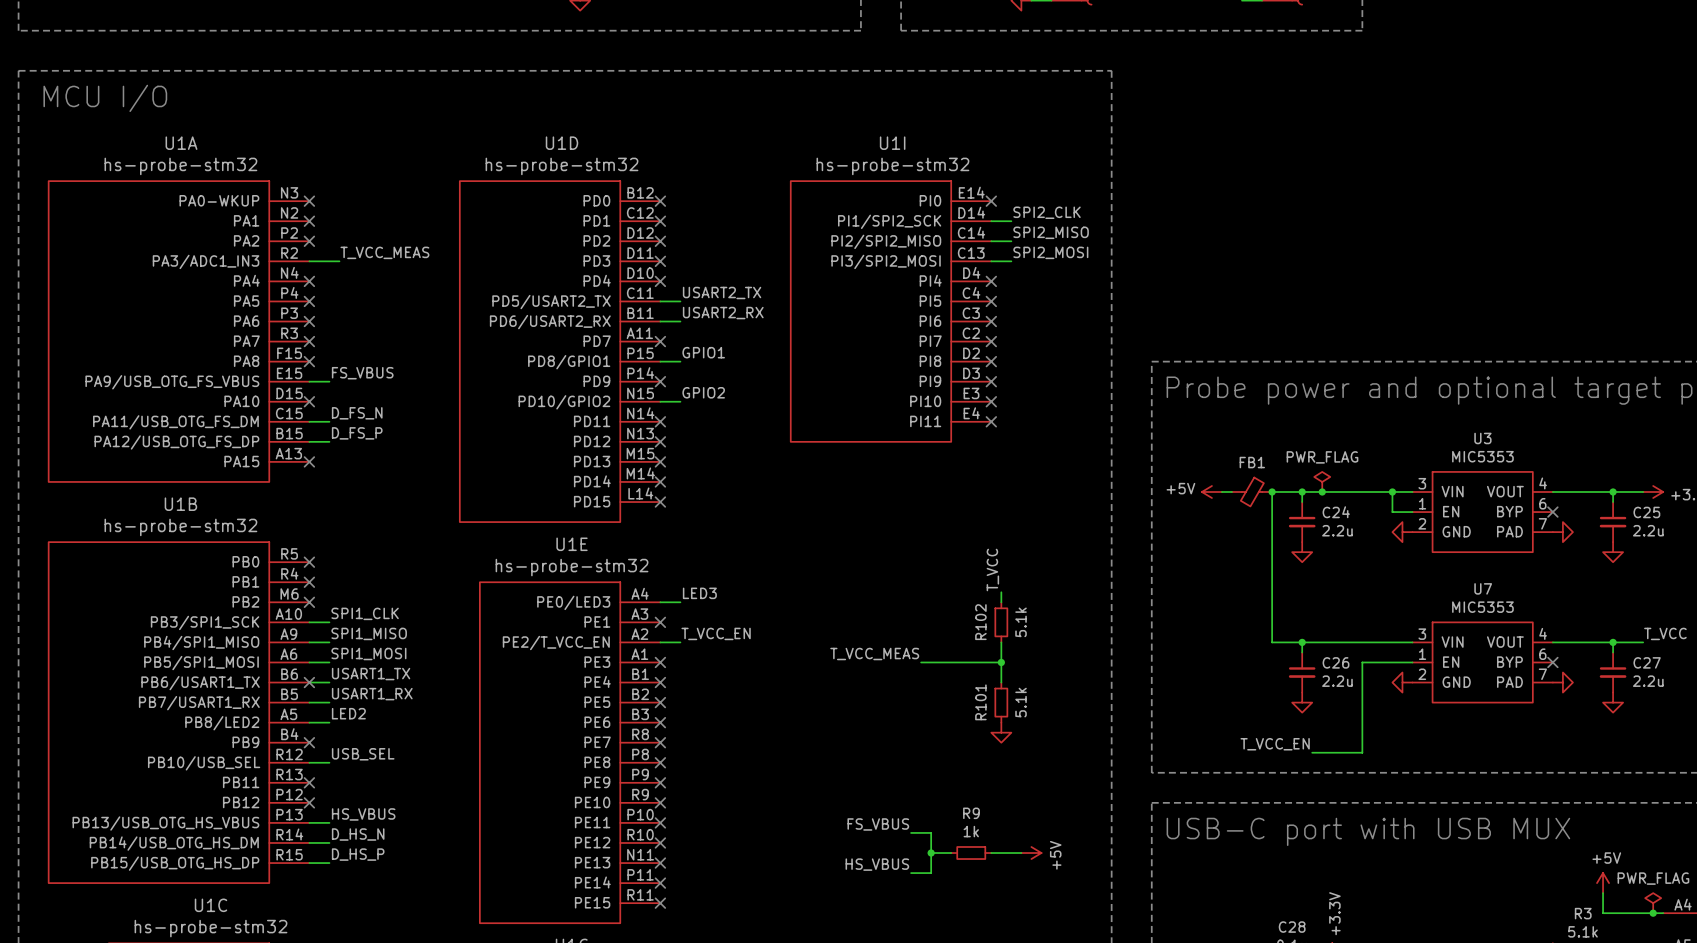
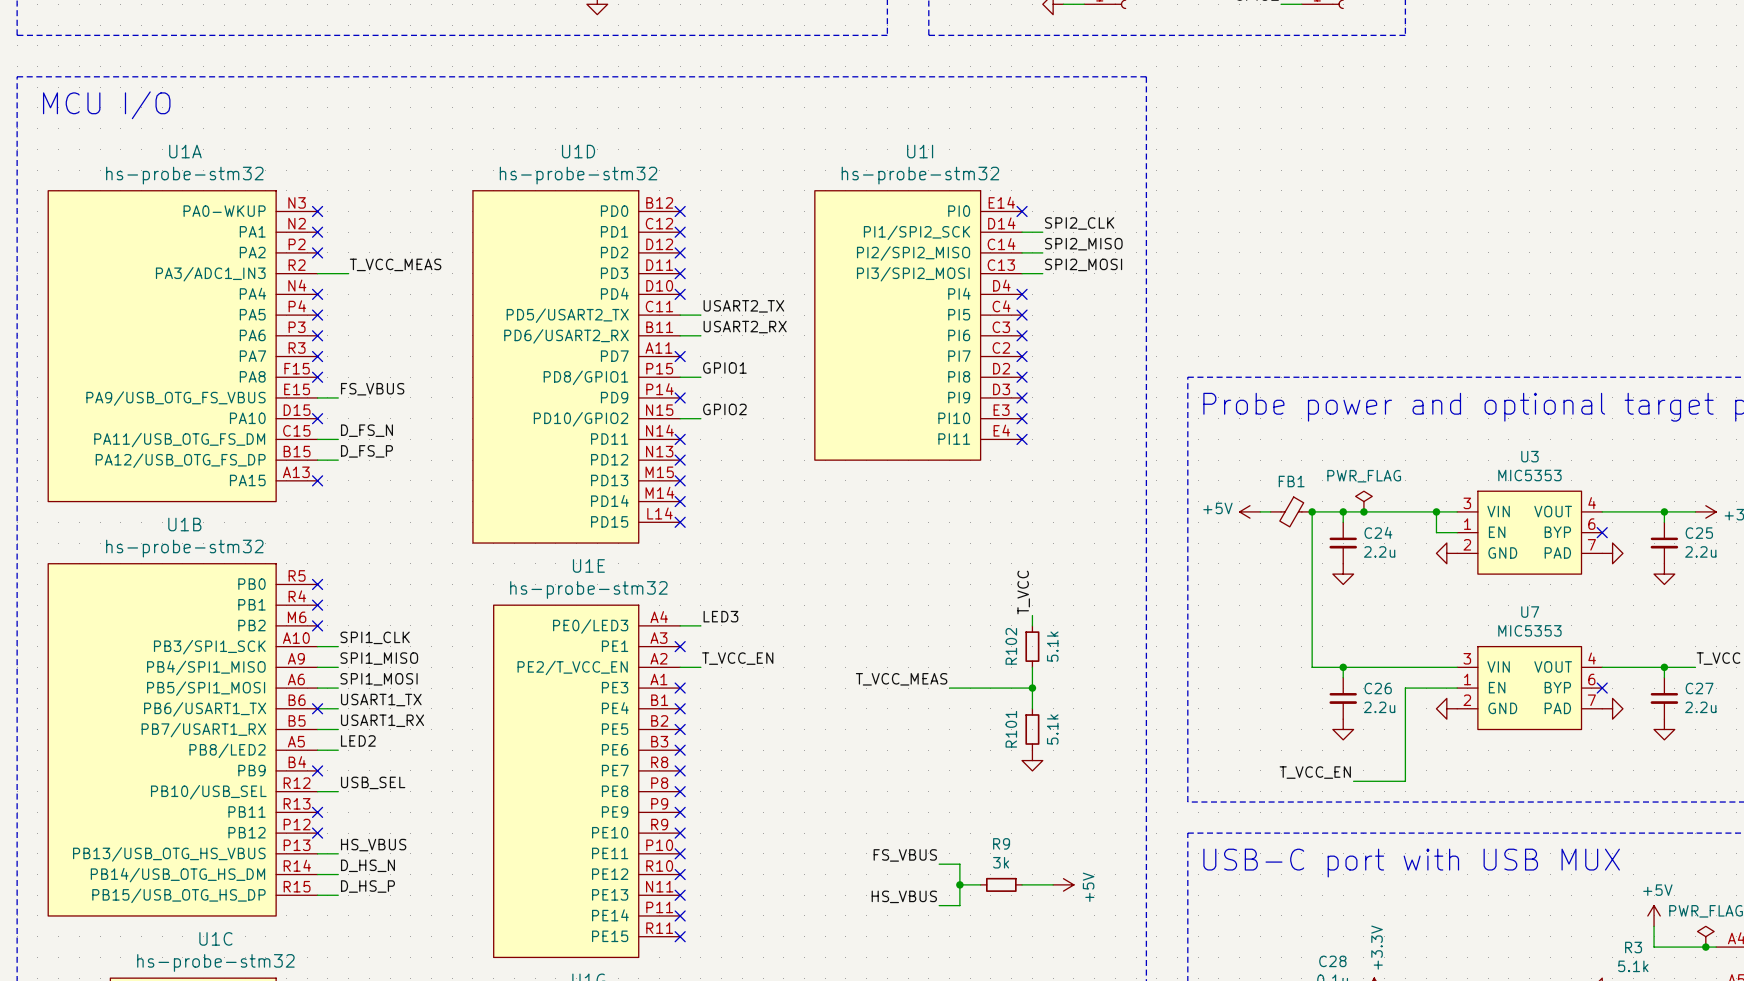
R9 value: 1k (971, 831) -> 3k (1001, 862)

